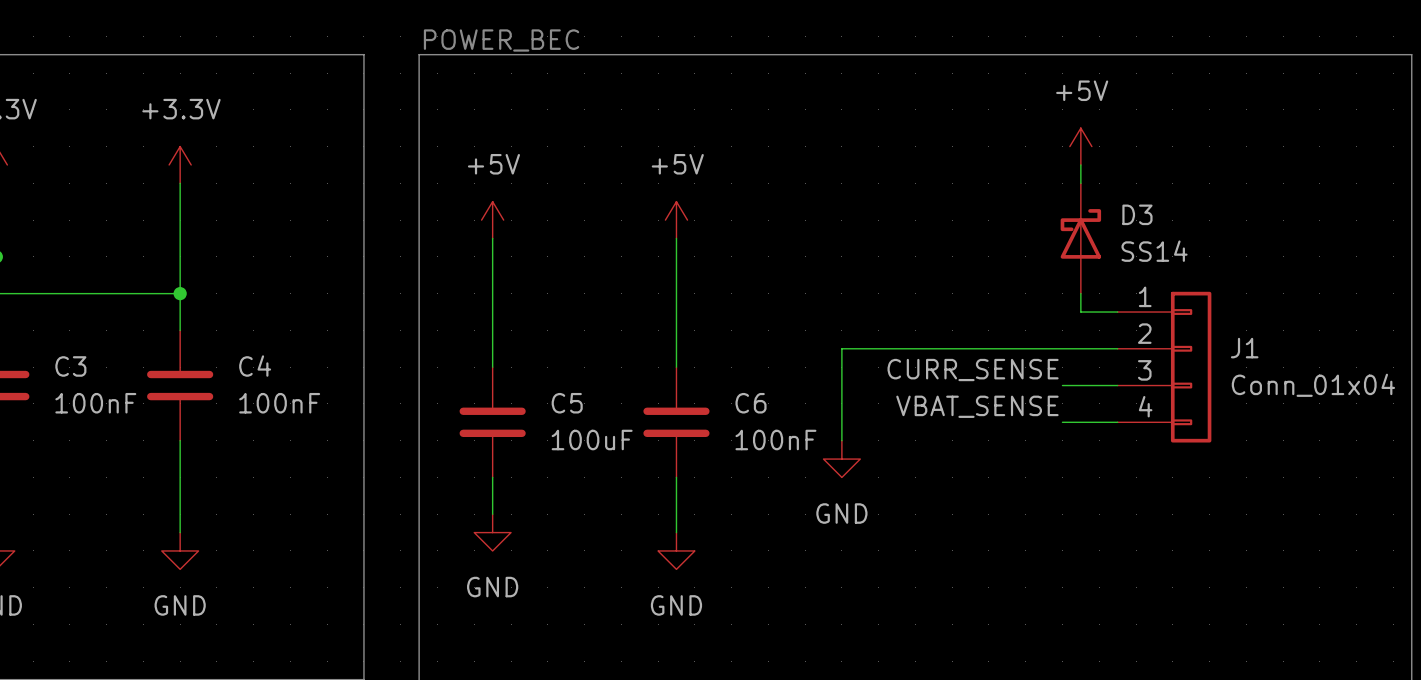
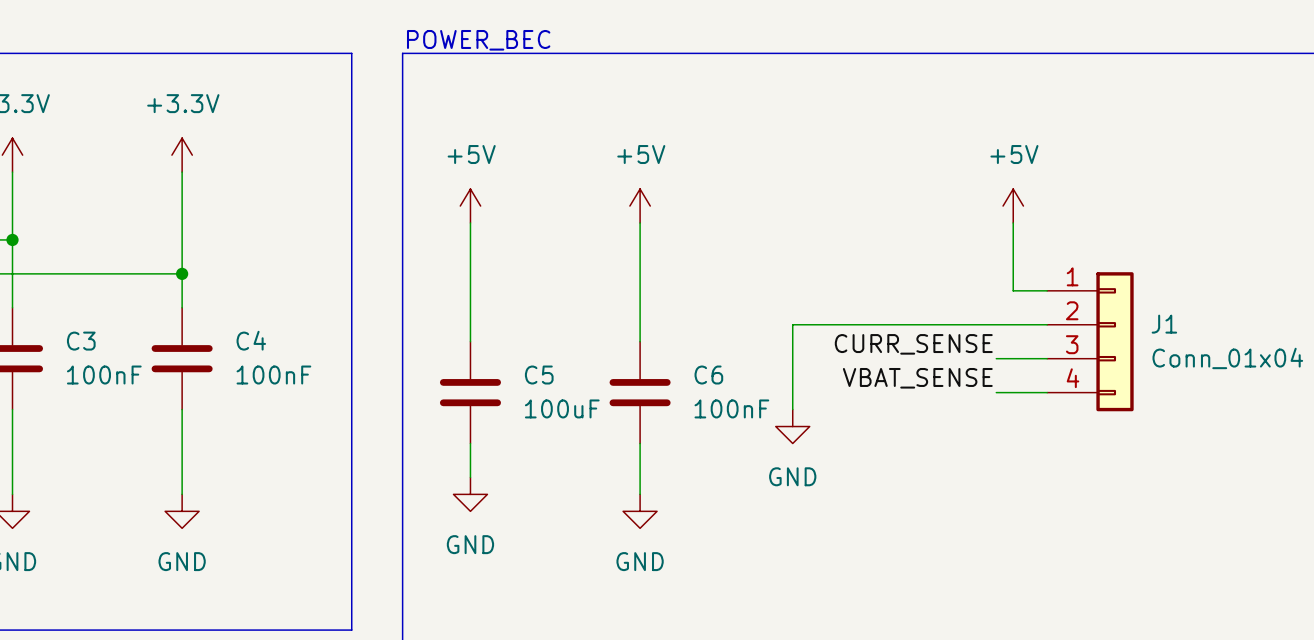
power symbol position: +5V (1080, 146) -> +5V (1013, 206)
wire: (1080, 164) (1080, 183) -> none
D3: SS14 (1080, 238) -> none

